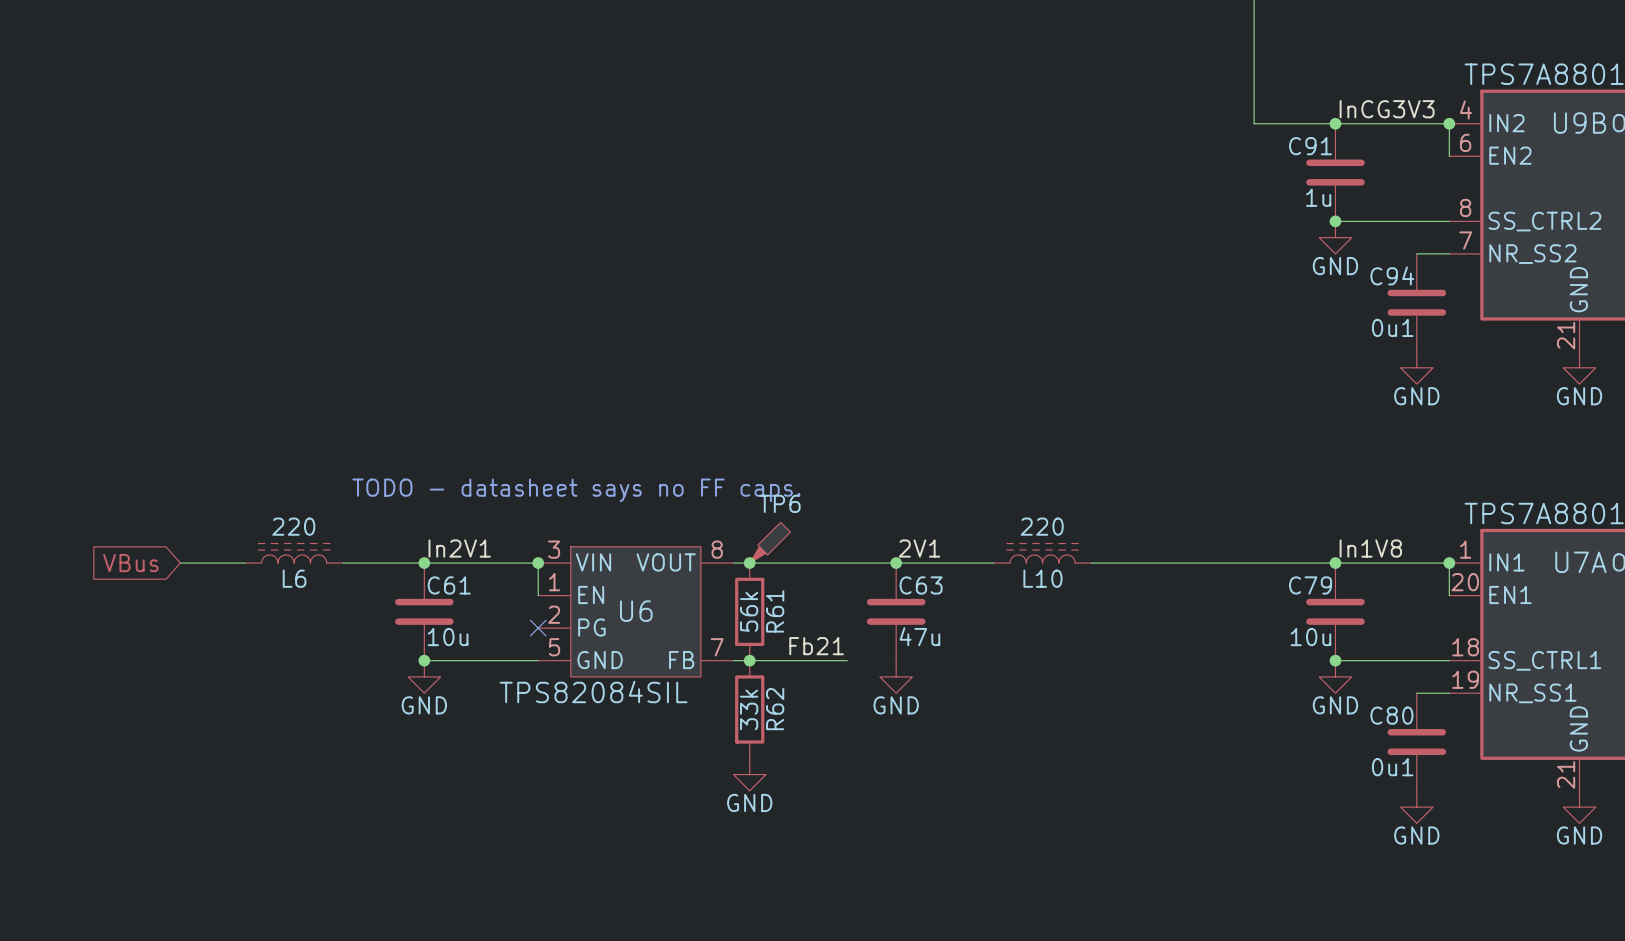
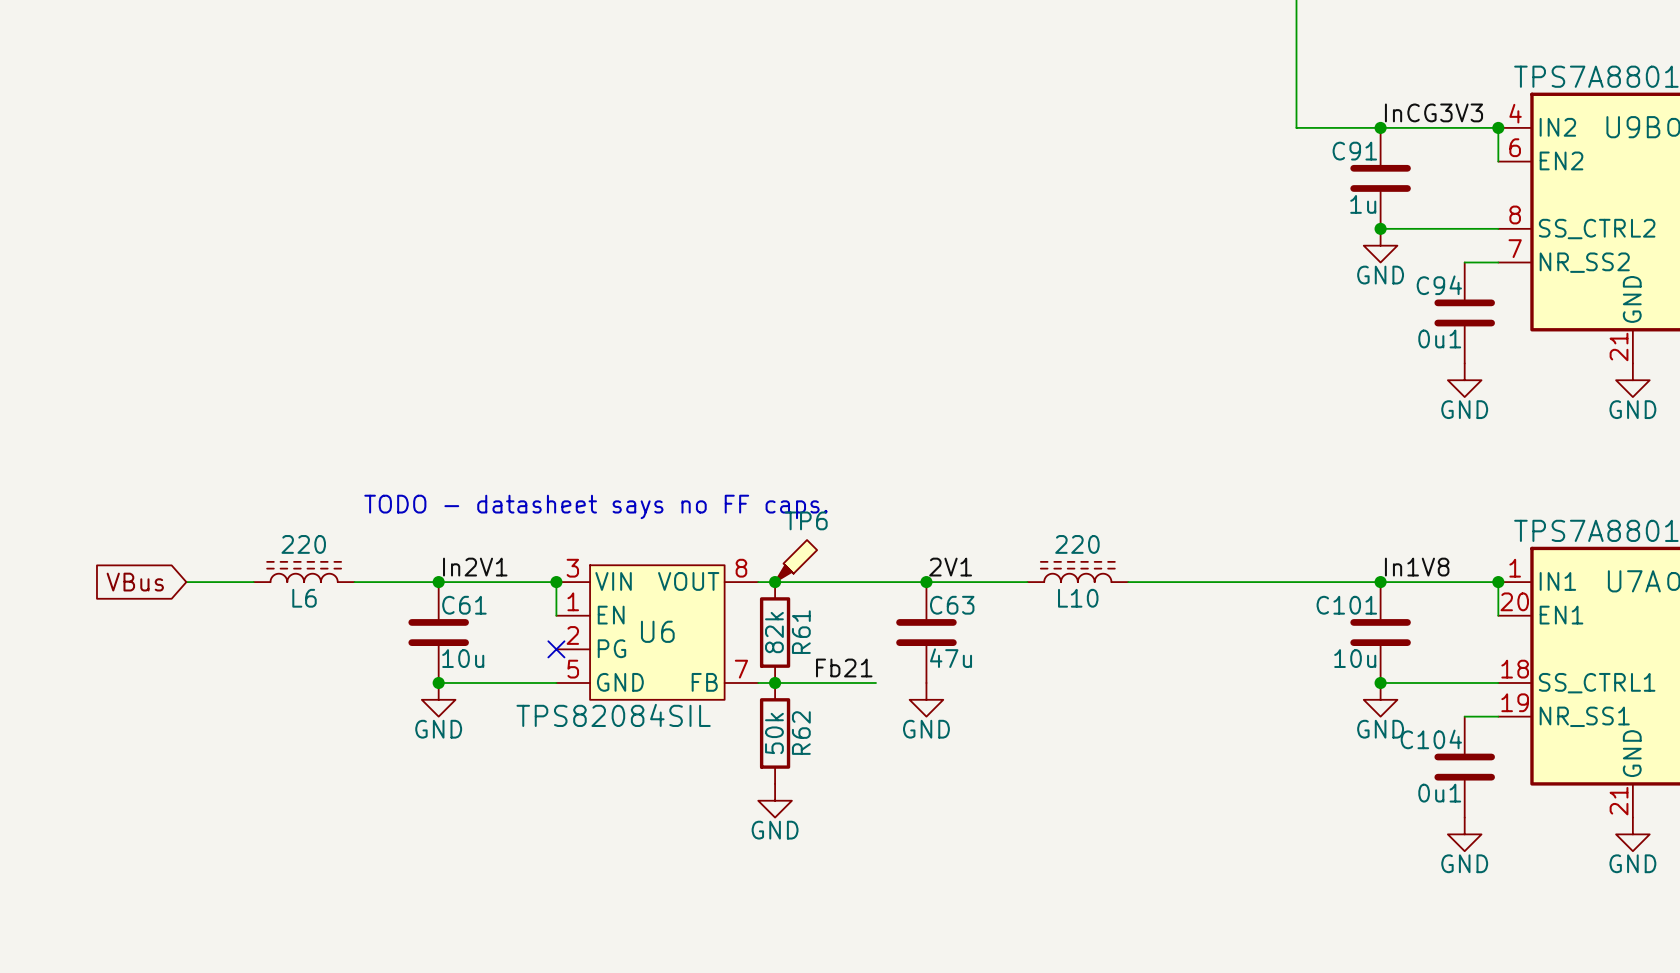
C79 name: C79 (1310, 585) -> C101 (1346, 605)
R61 value: 56k (749, 611) -> 82k (774, 632)
R62 value: 33k (749, 709) -> 50k (774, 733)
C80 name: C80 (1391, 715) -> C104 (1431, 739)

